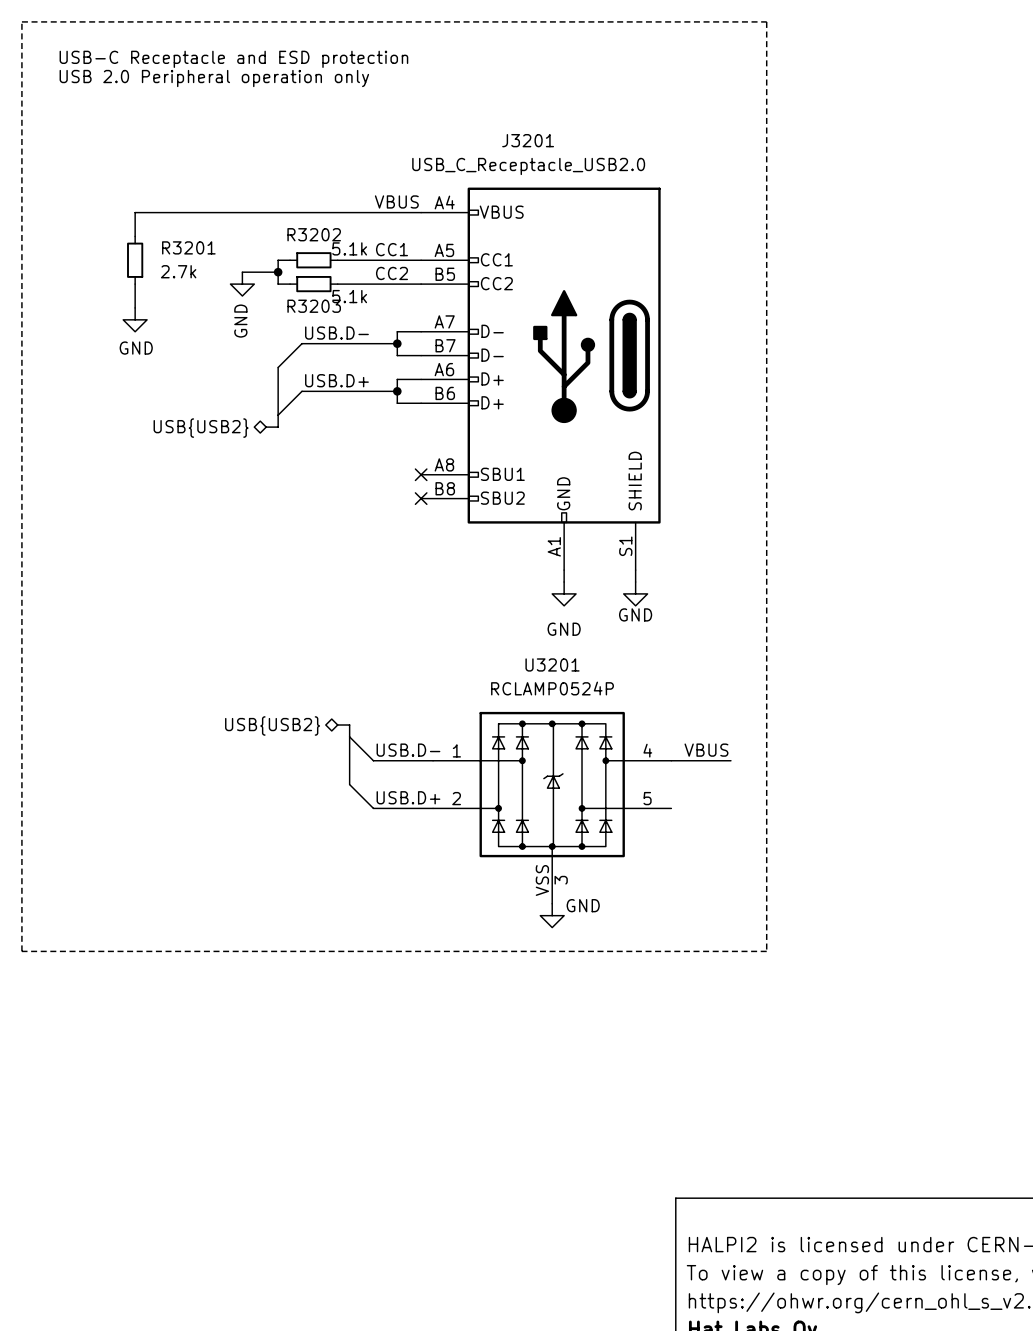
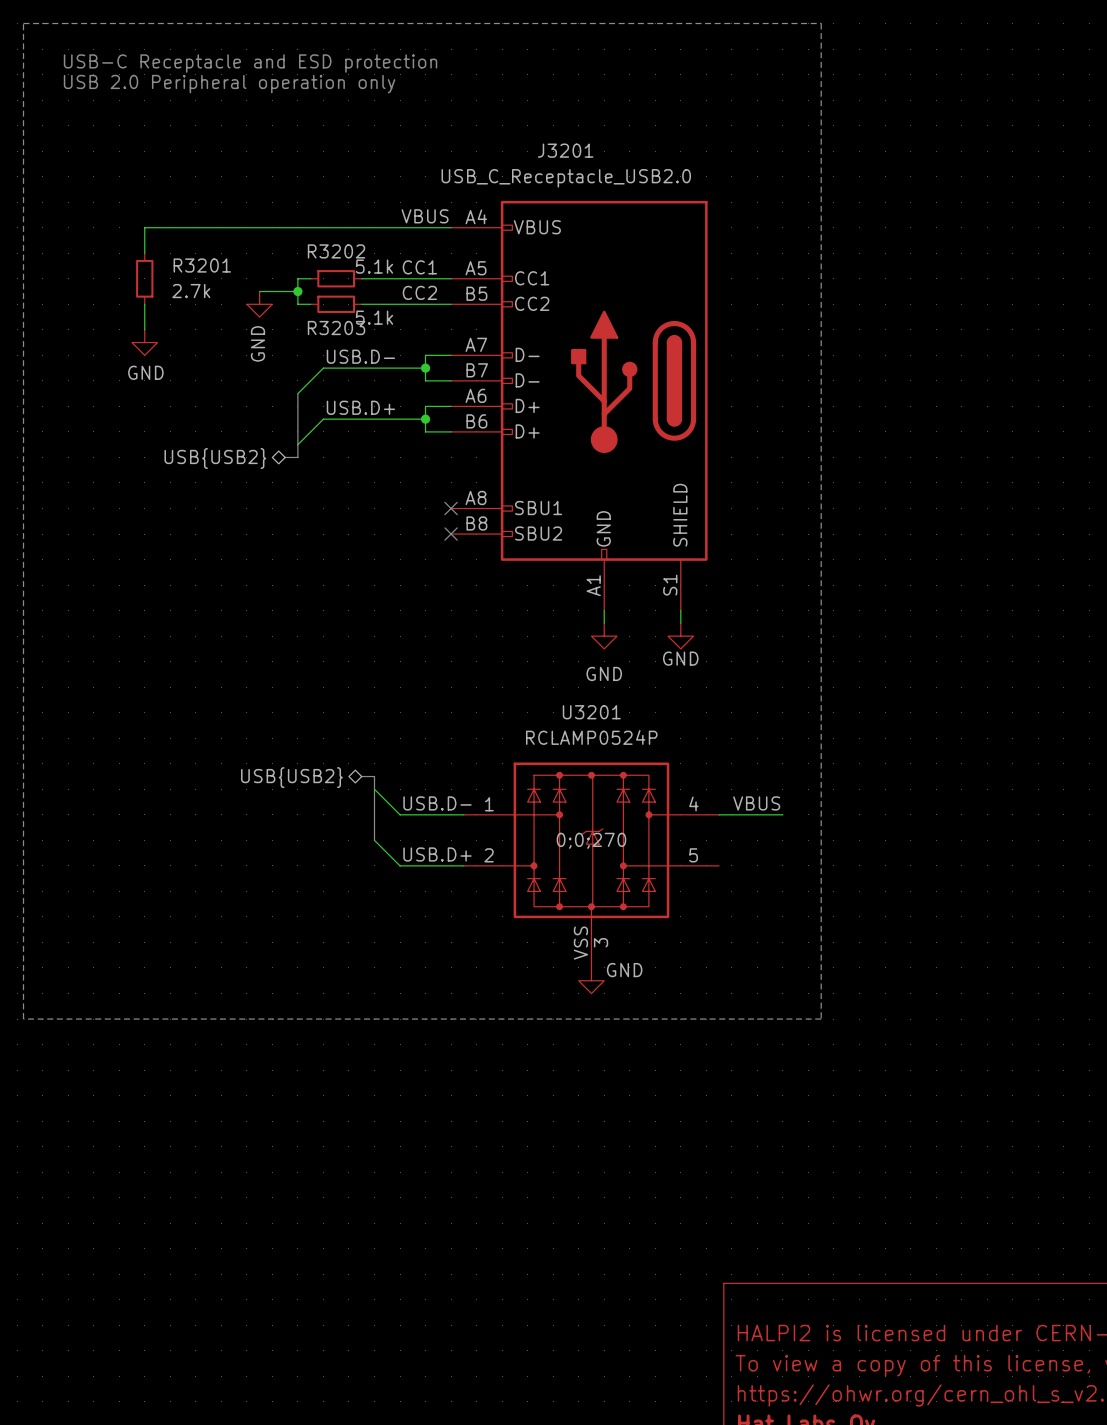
U3201 text: none -> 0;0;270 (591, 840)

